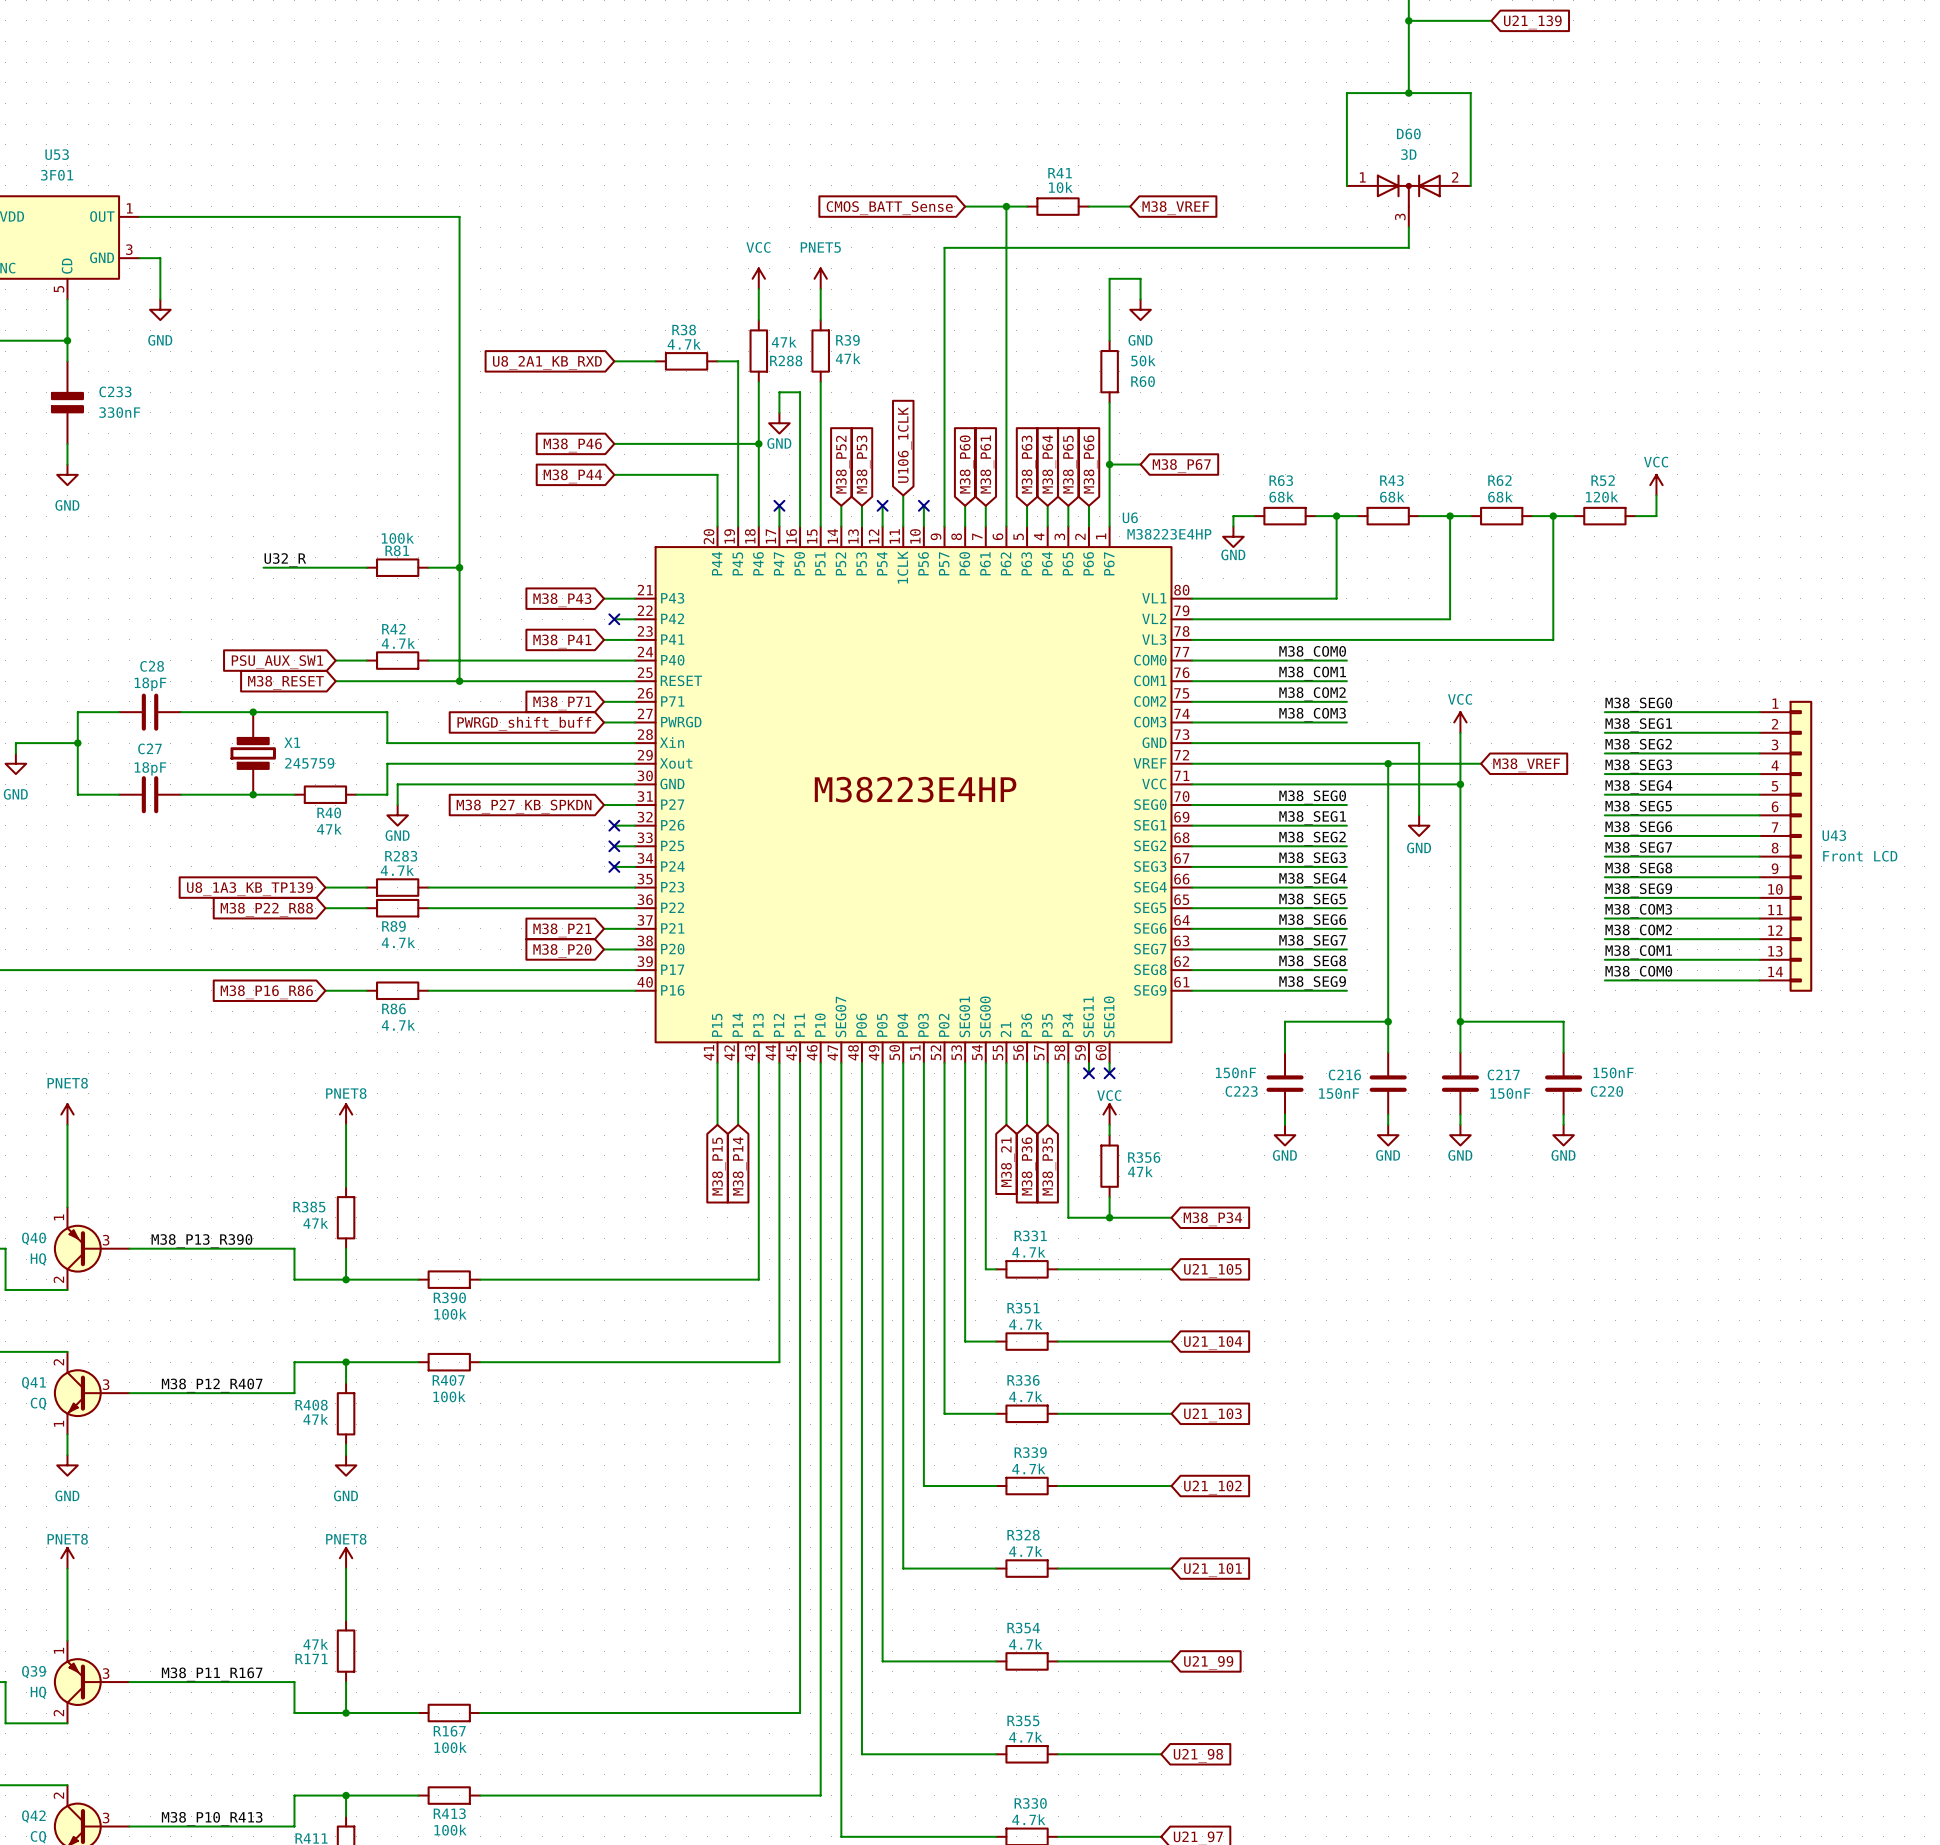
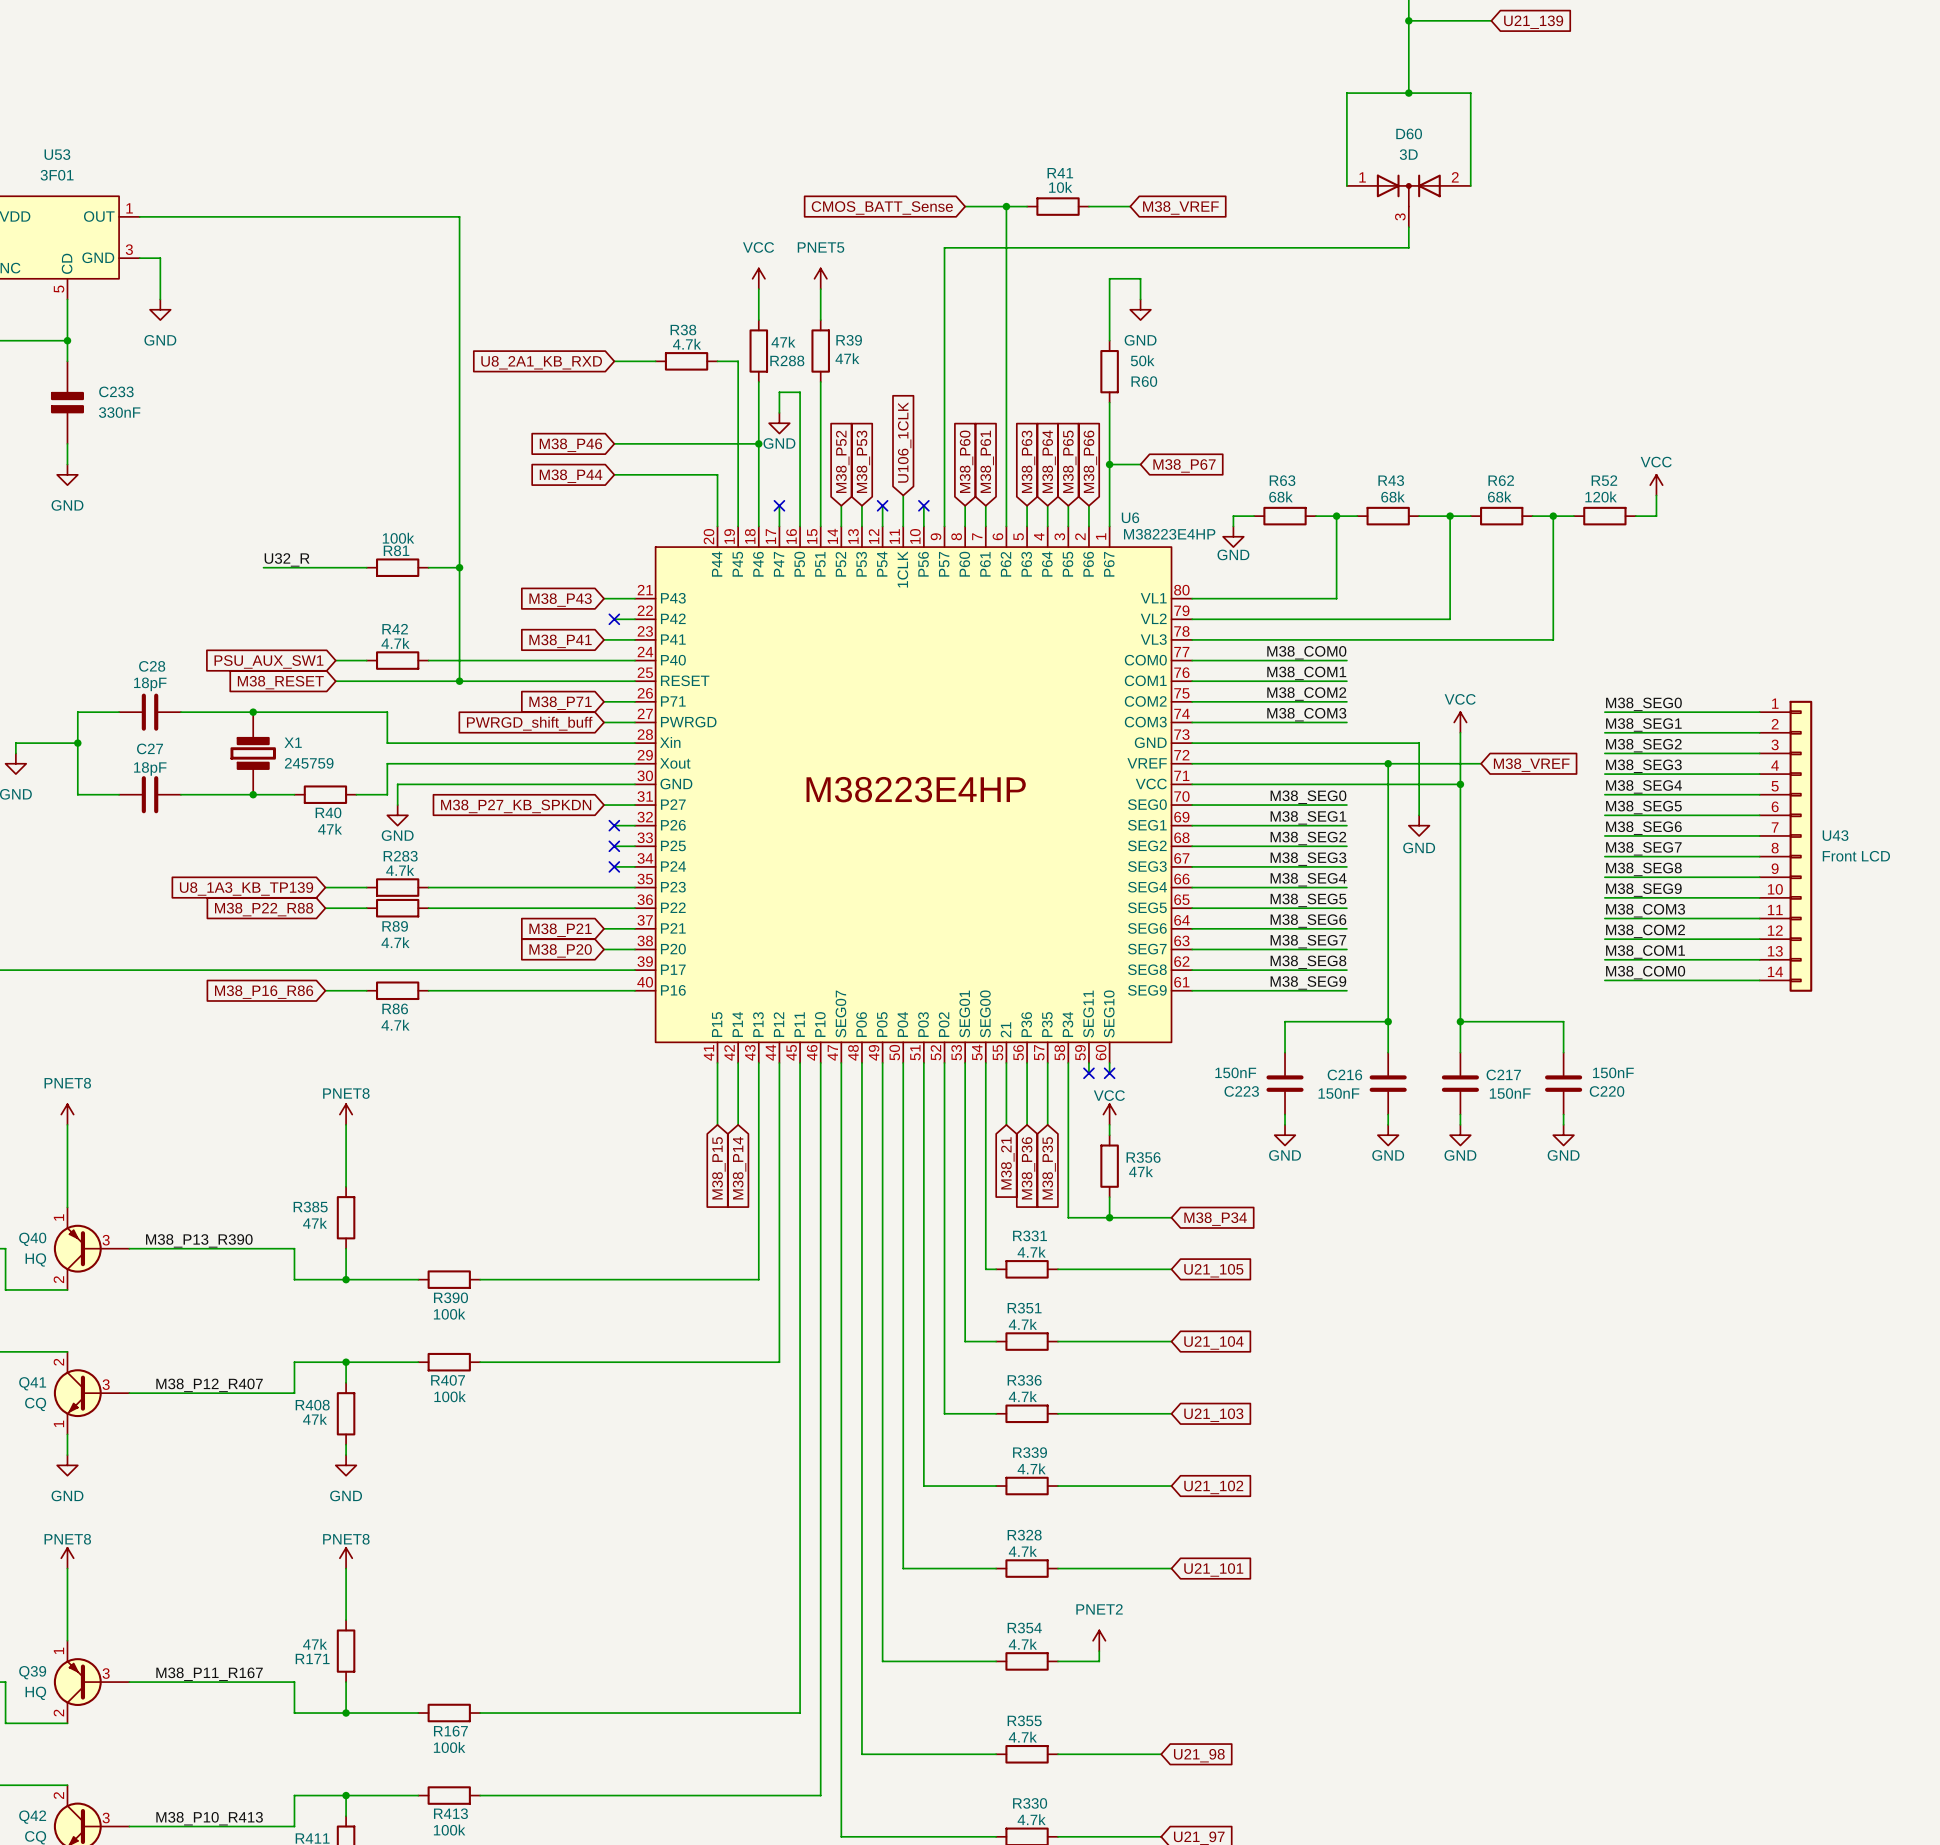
power symbol: none -> PNET2 (1099, 1640)
wire: (1099, 1661) (1171, 1661) -> (1099, 1661) (1099, 1651)
global label: U21_99 (1208, 1662) -> none

